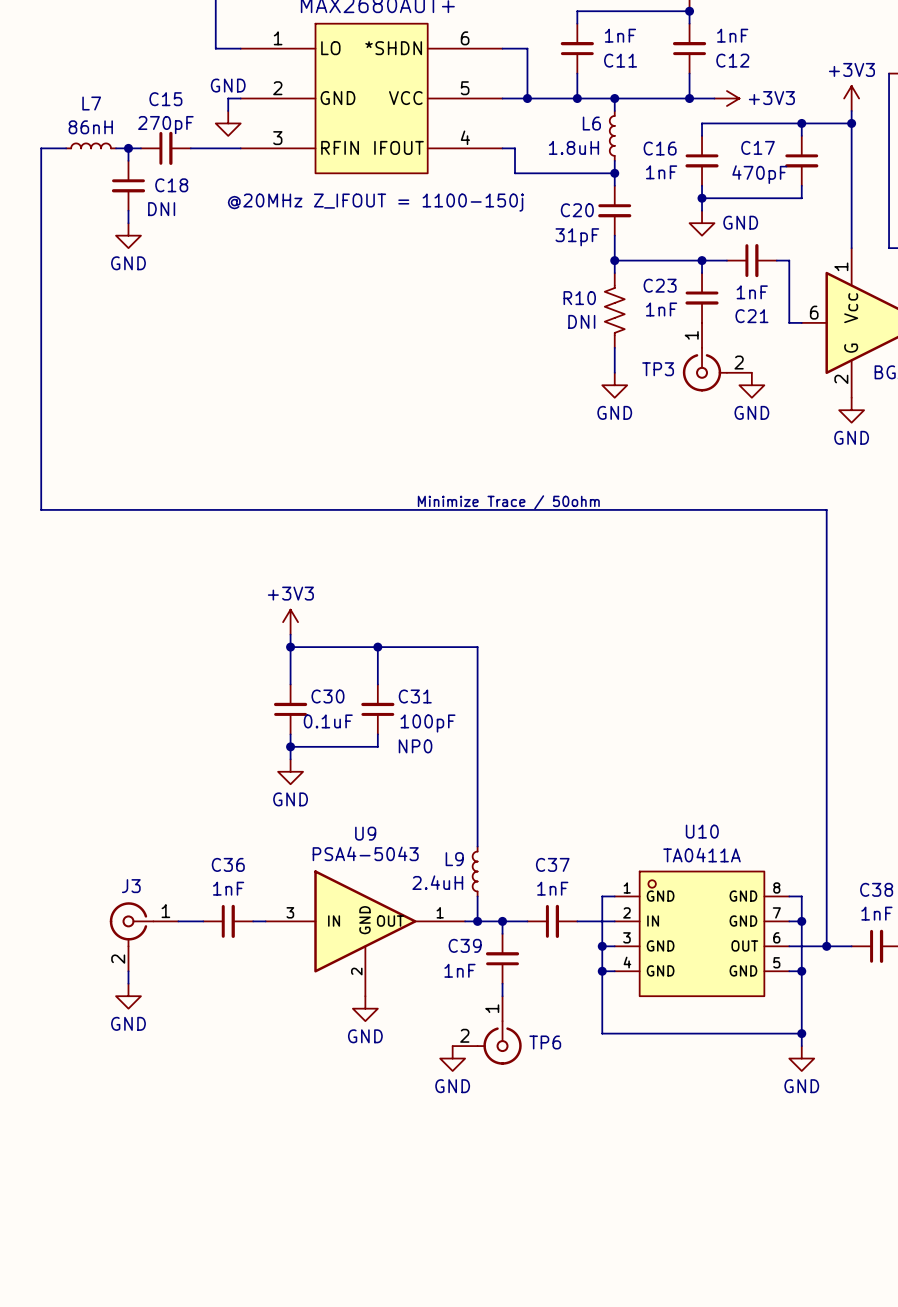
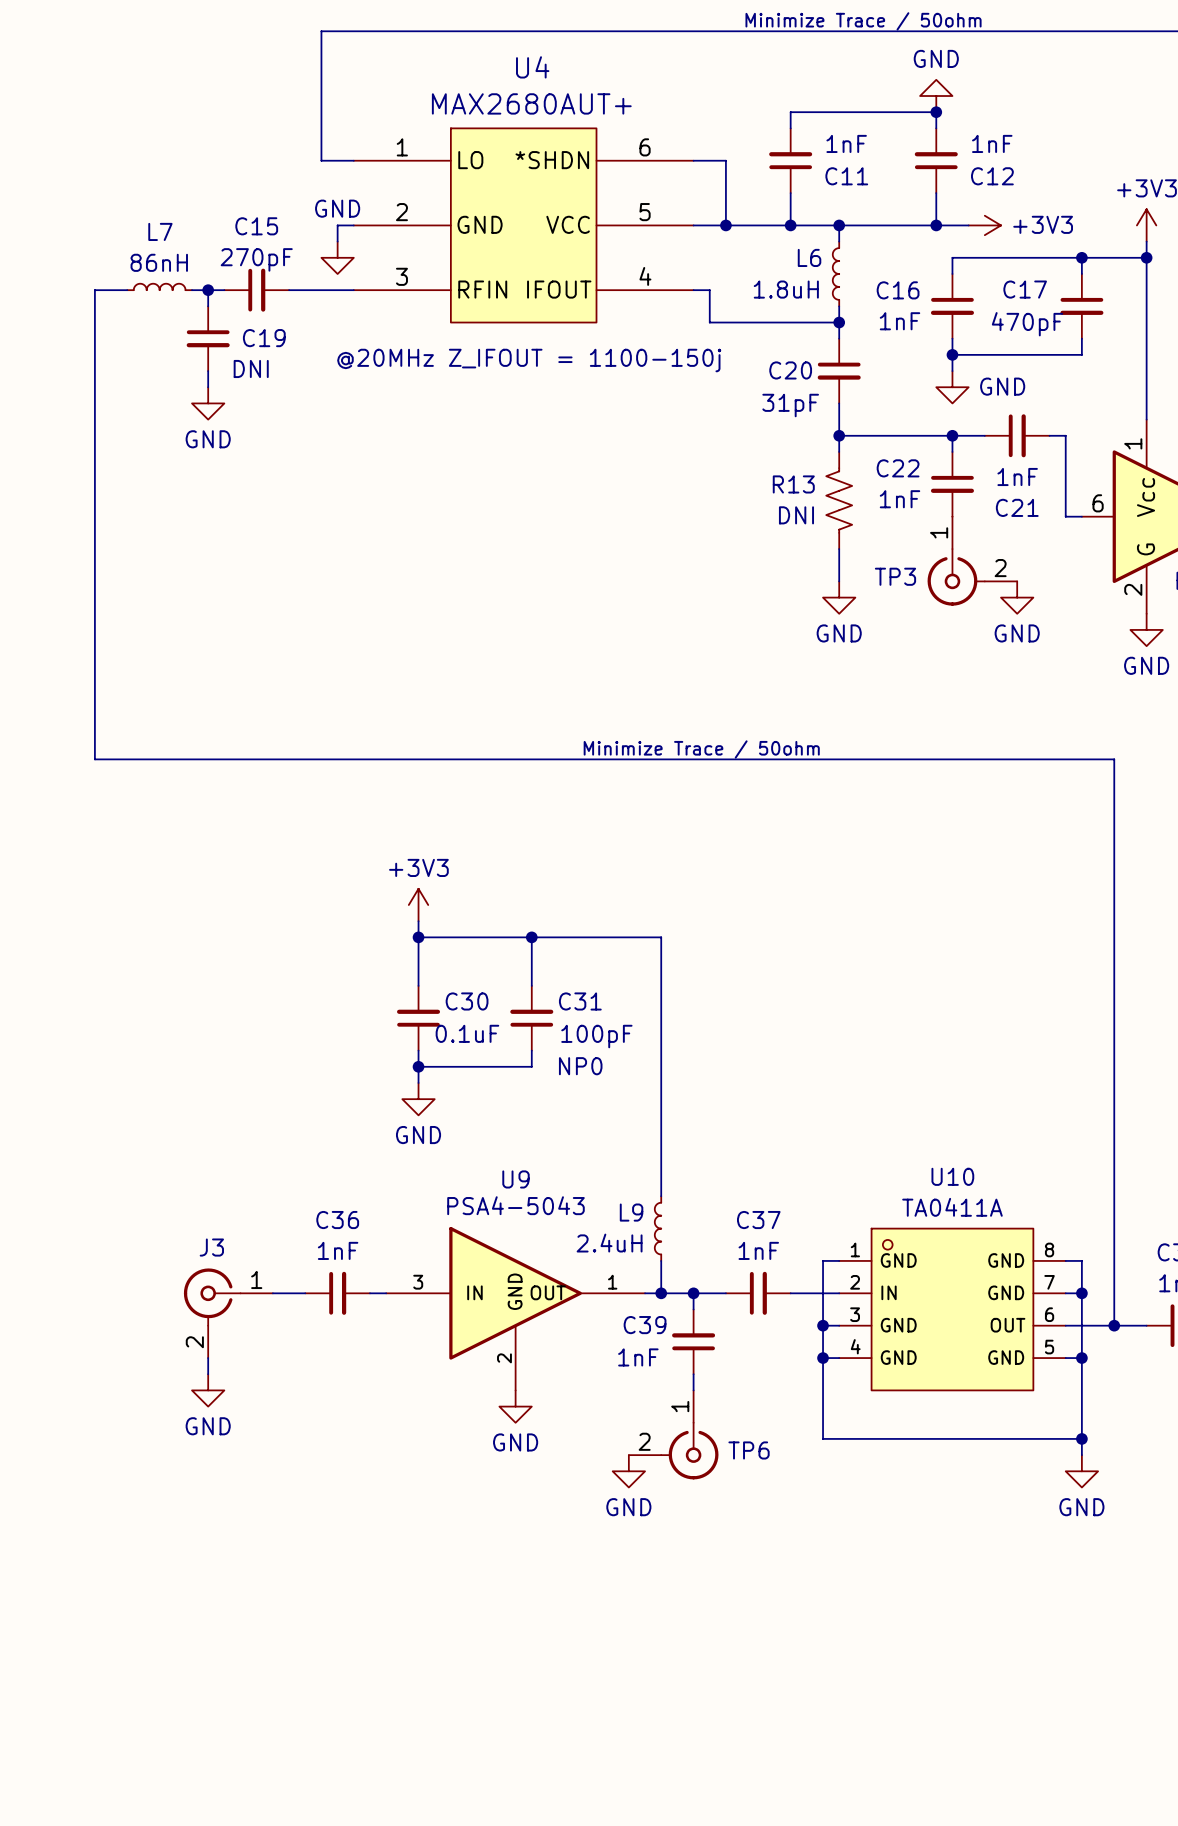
C18 name: C18 (171, 185) -> C19 (264, 338)
C23 name: C23 (660, 285) -> C22 (898, 468)
R10 name: R10 (579, 298) -> R13 (793, 484)

